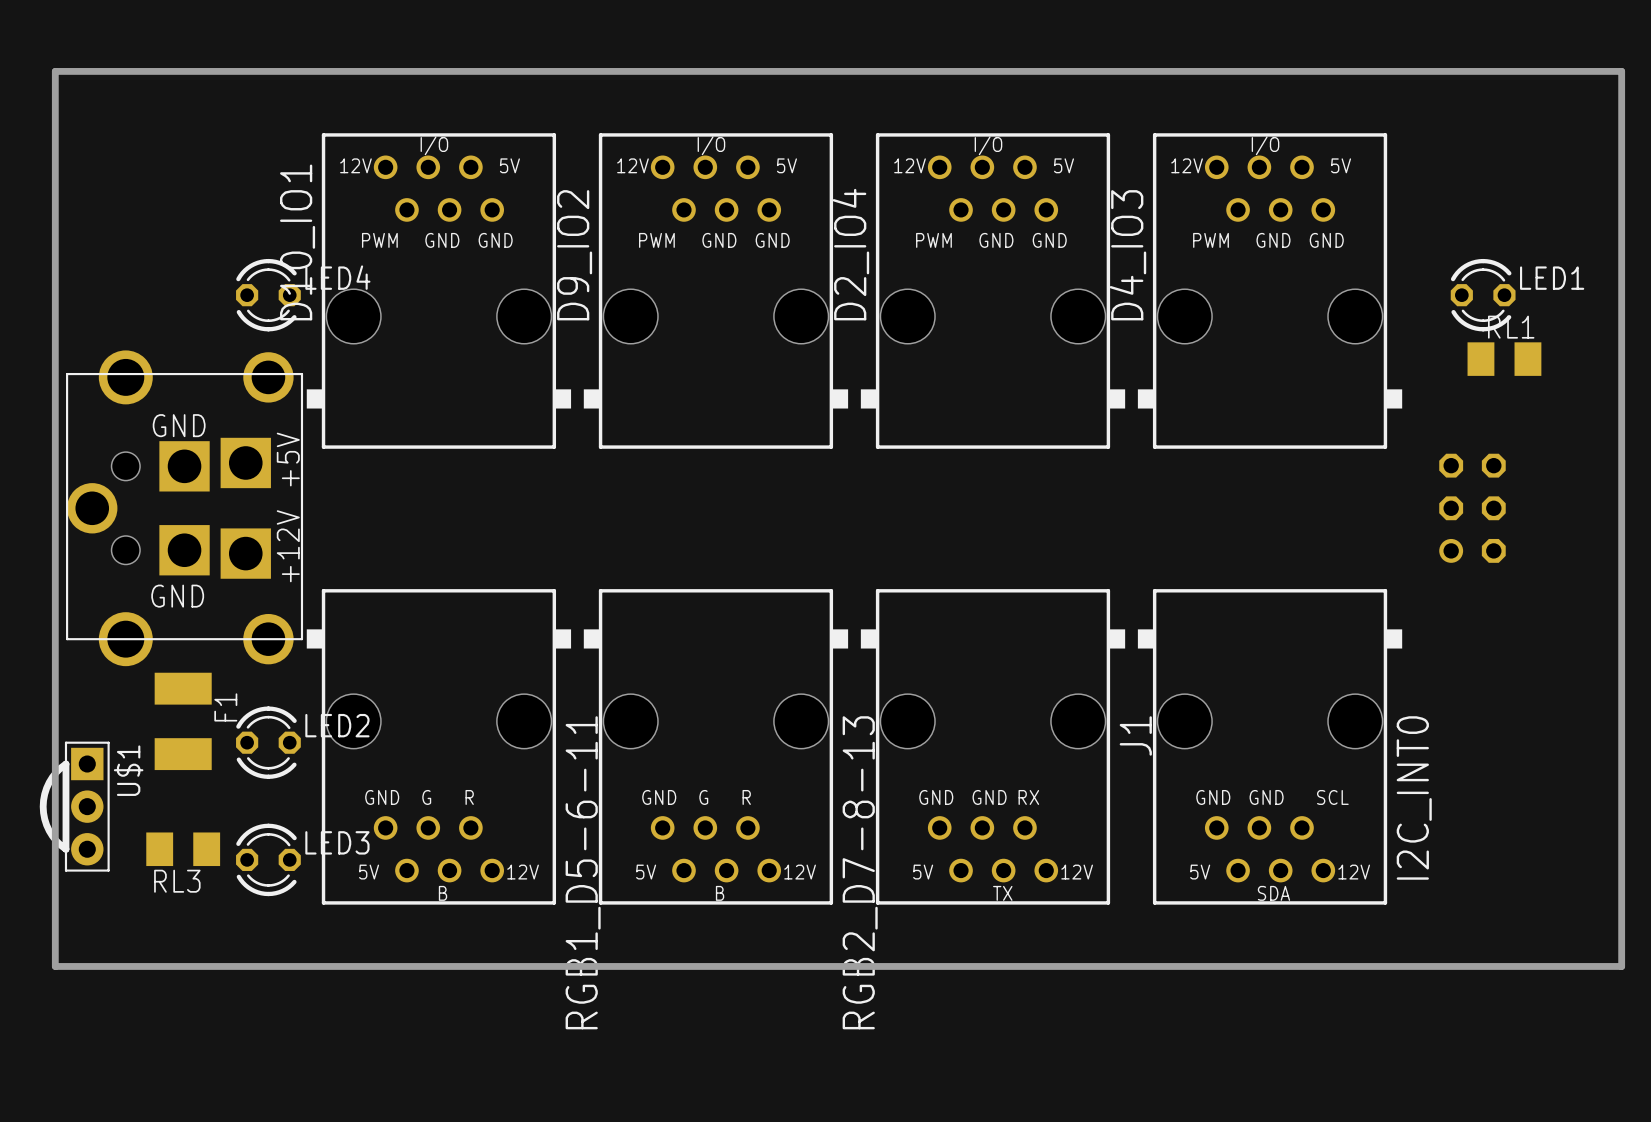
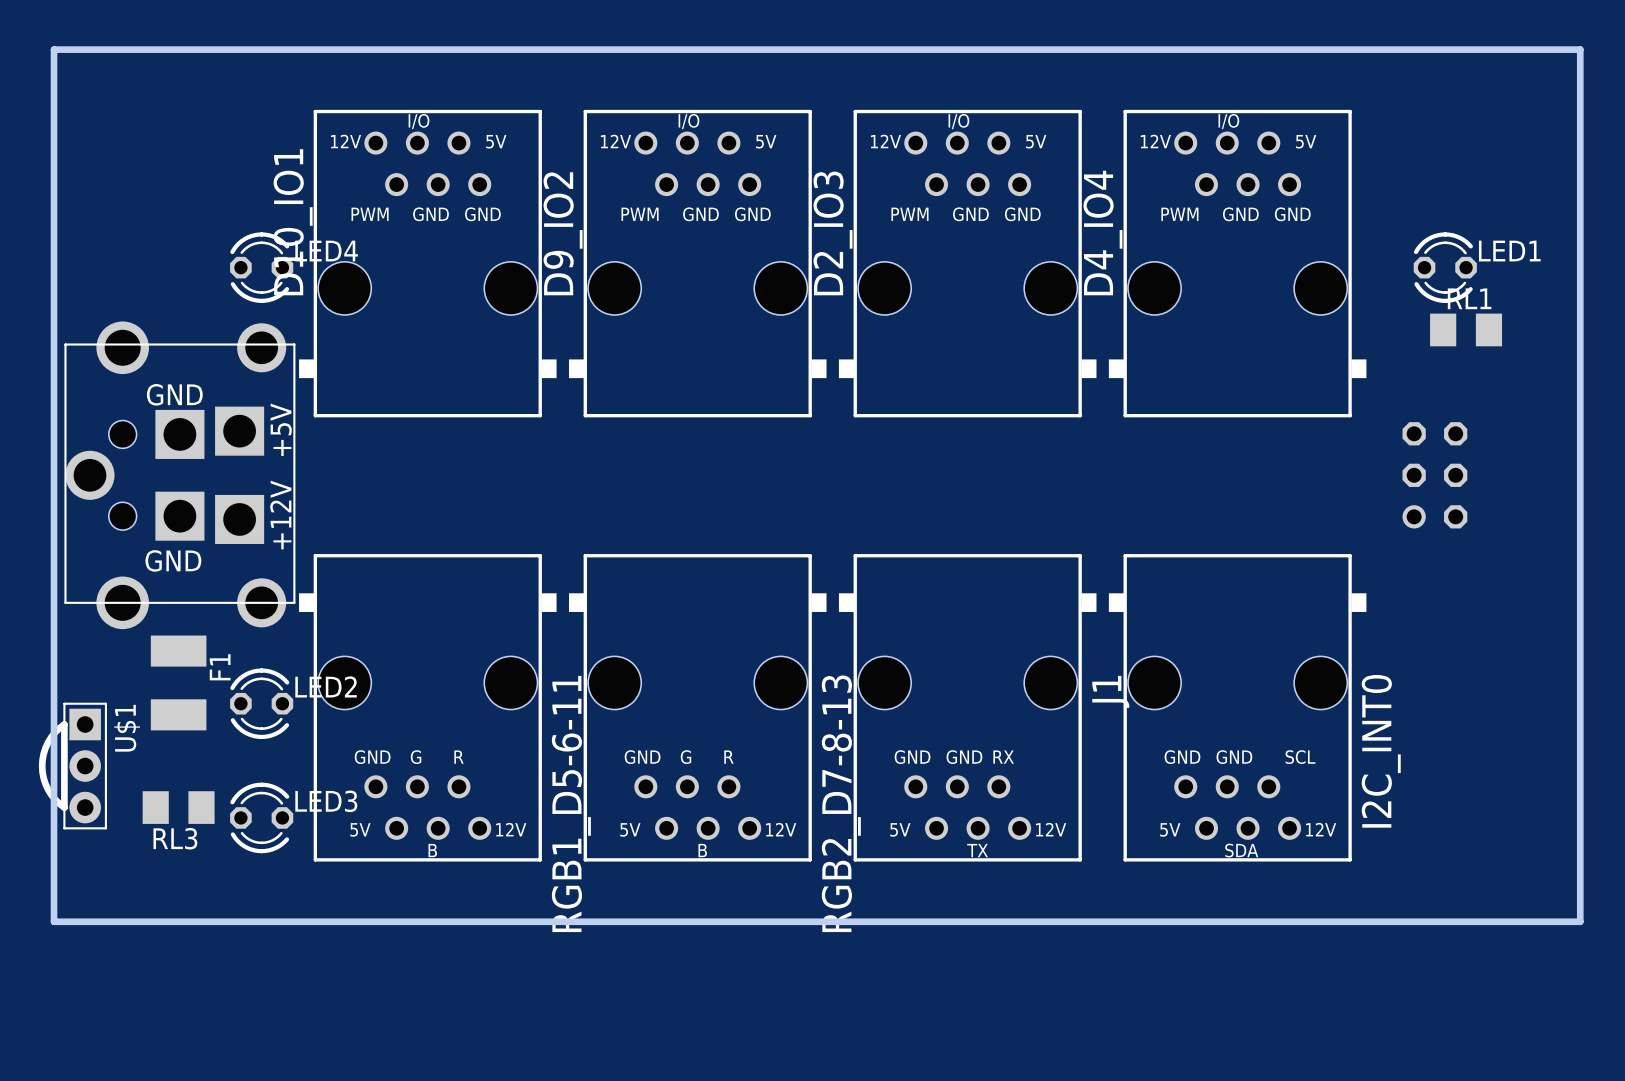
D2_IO4 name: D2_IO4 (850, 254) -> D2_IO3 (833, 233)
D4_IO3 name: D4_IO3 (1127, 255) -> D4_IO4 (1102, 233)

